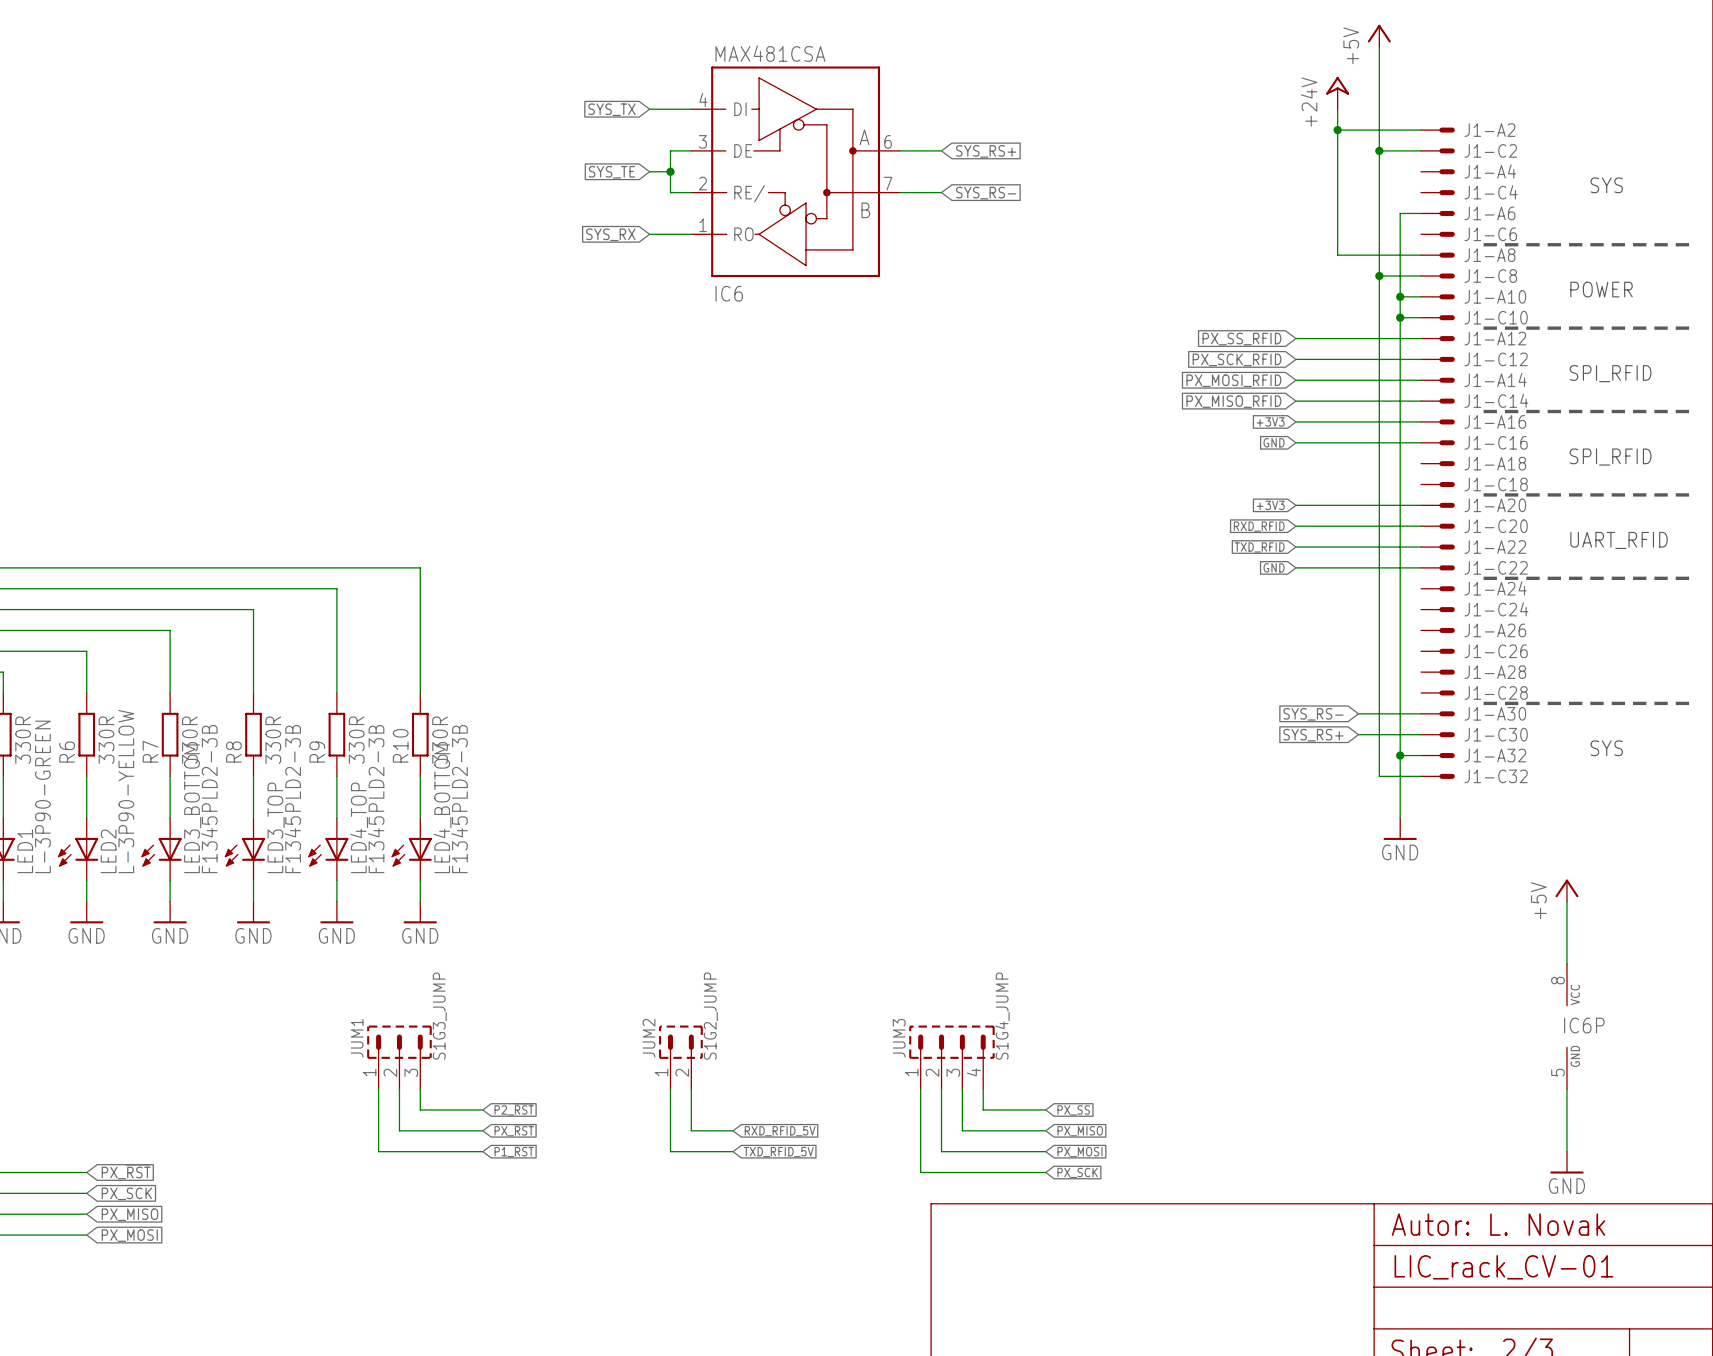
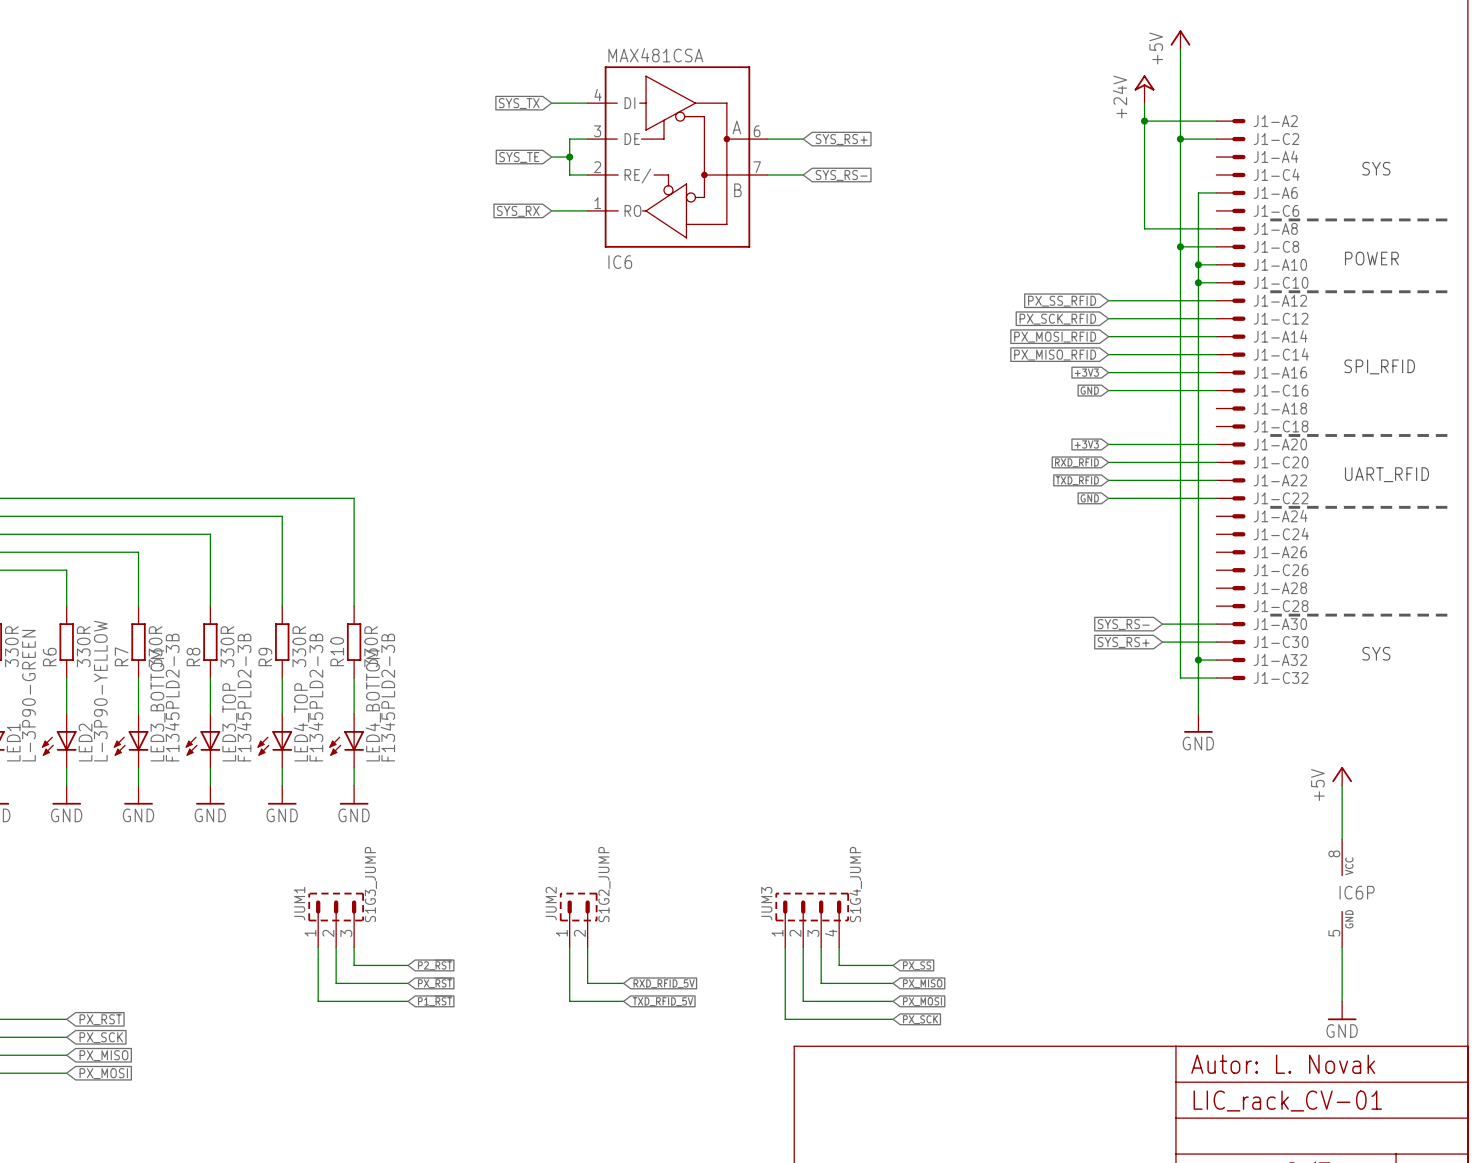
text: SPI_RFID (1610, 373) -> none
line: (1483, 411) (1692, 411) -> none
text: none -> SPI_RFID (1379, 366)
text: SPI_RFID (1610, 457) -> none

